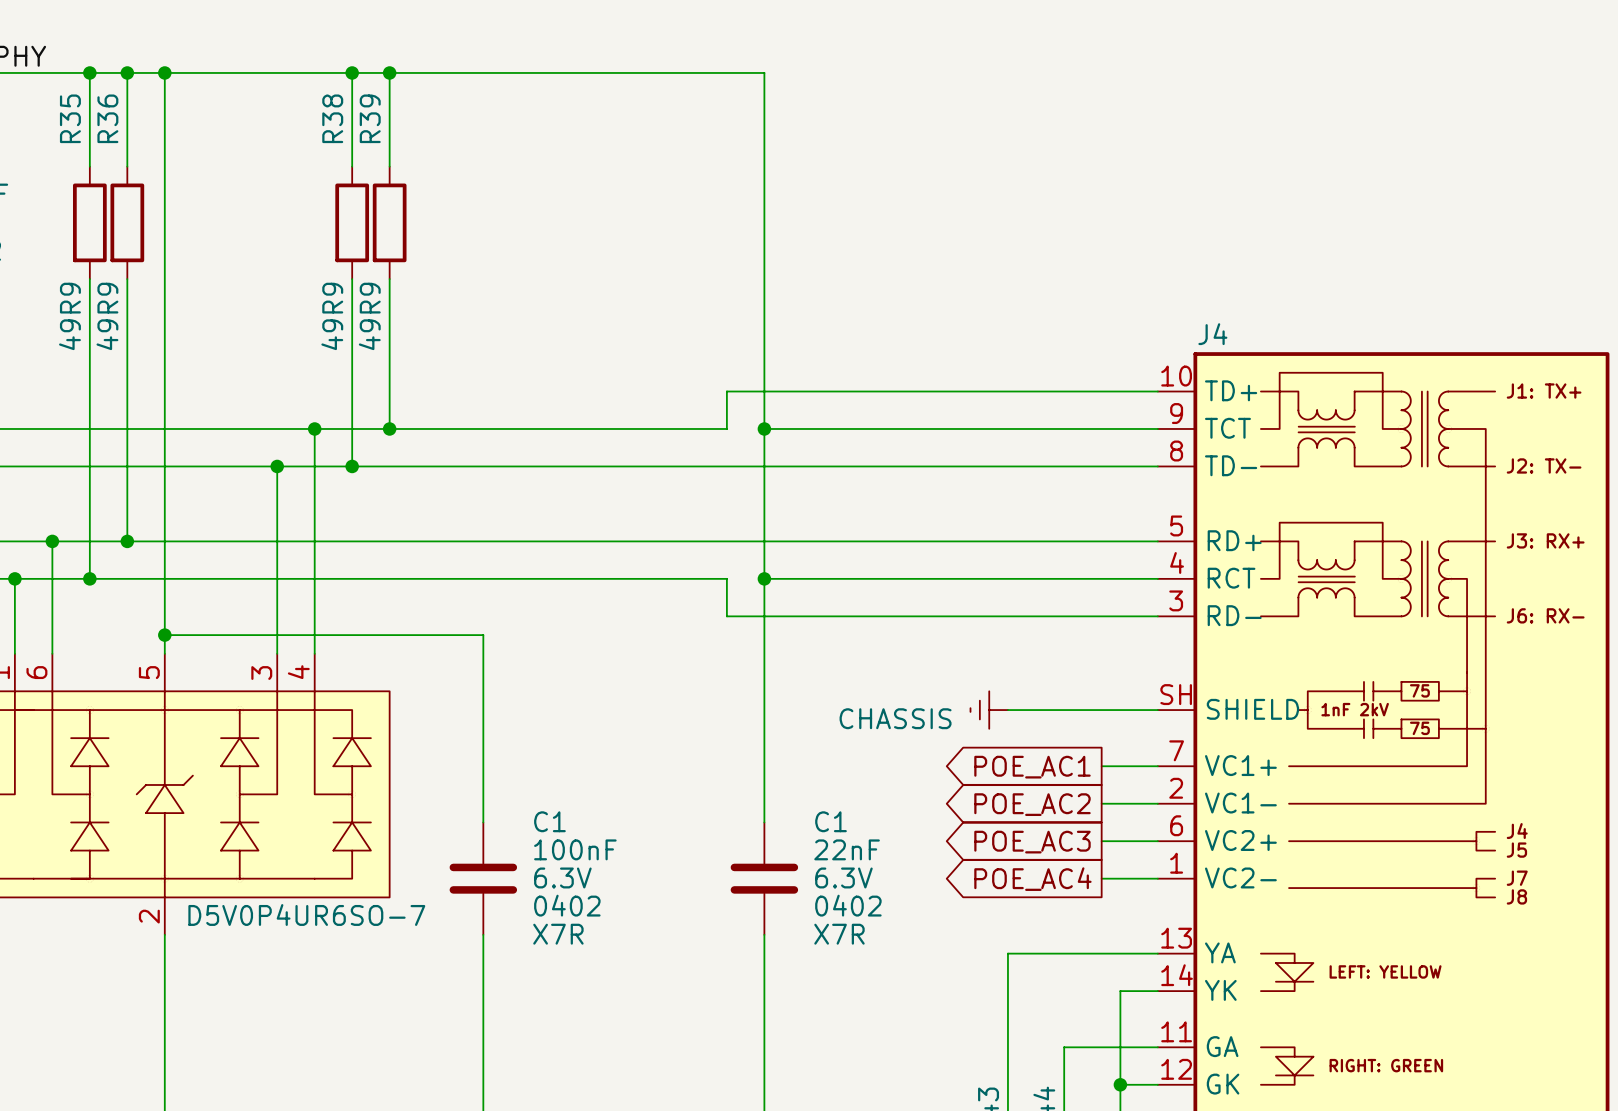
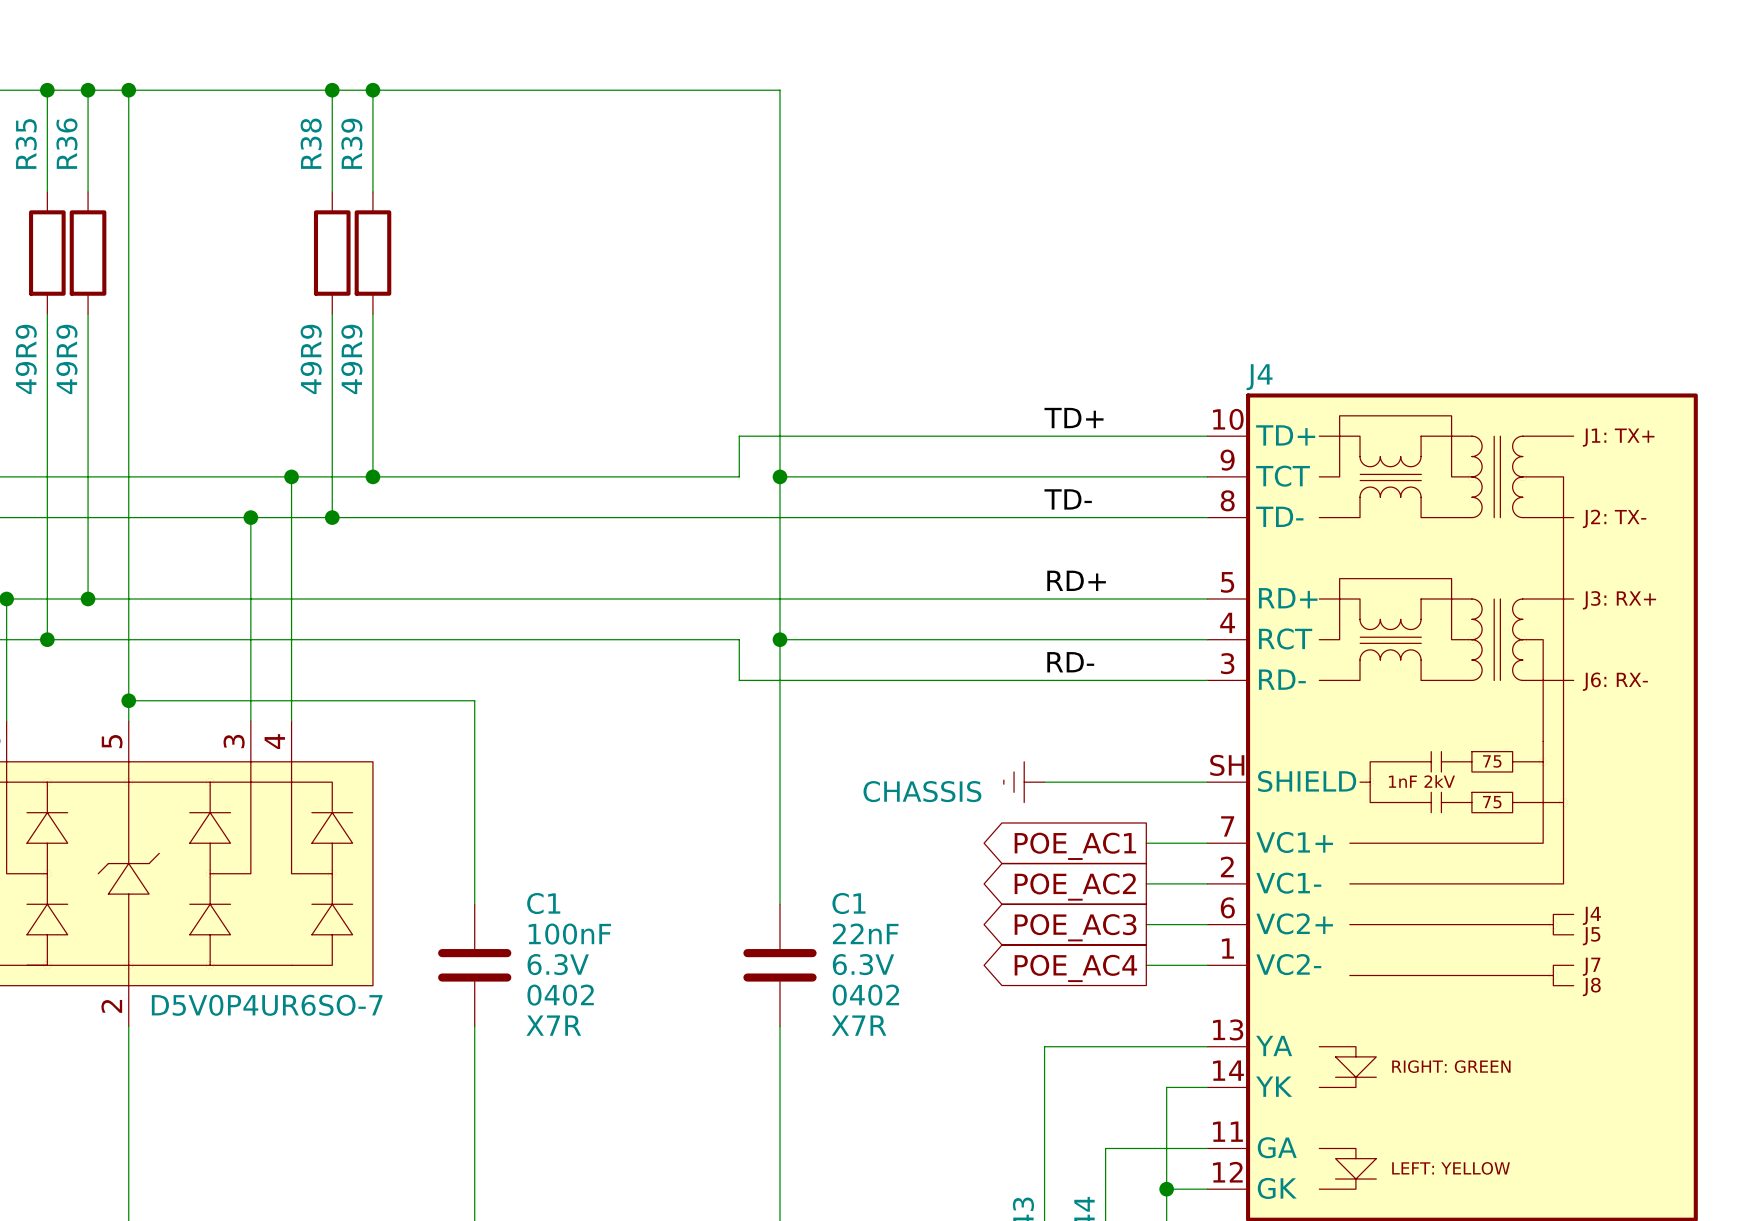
label: none -> TD+ (1074, 418)
label: none -> TD- (1068, 499)
label: none -> RD+ (1076, 580)
label: none -> RD- (1070, 662)
J4 text: LEFT: YELLOW (1385, 971) -> RIGHT: GREEN (1451, 1066)
J4 text: RIGHT: GREEN (1386, 1065) -> LEFT: YELLOW (1451, 1168)

